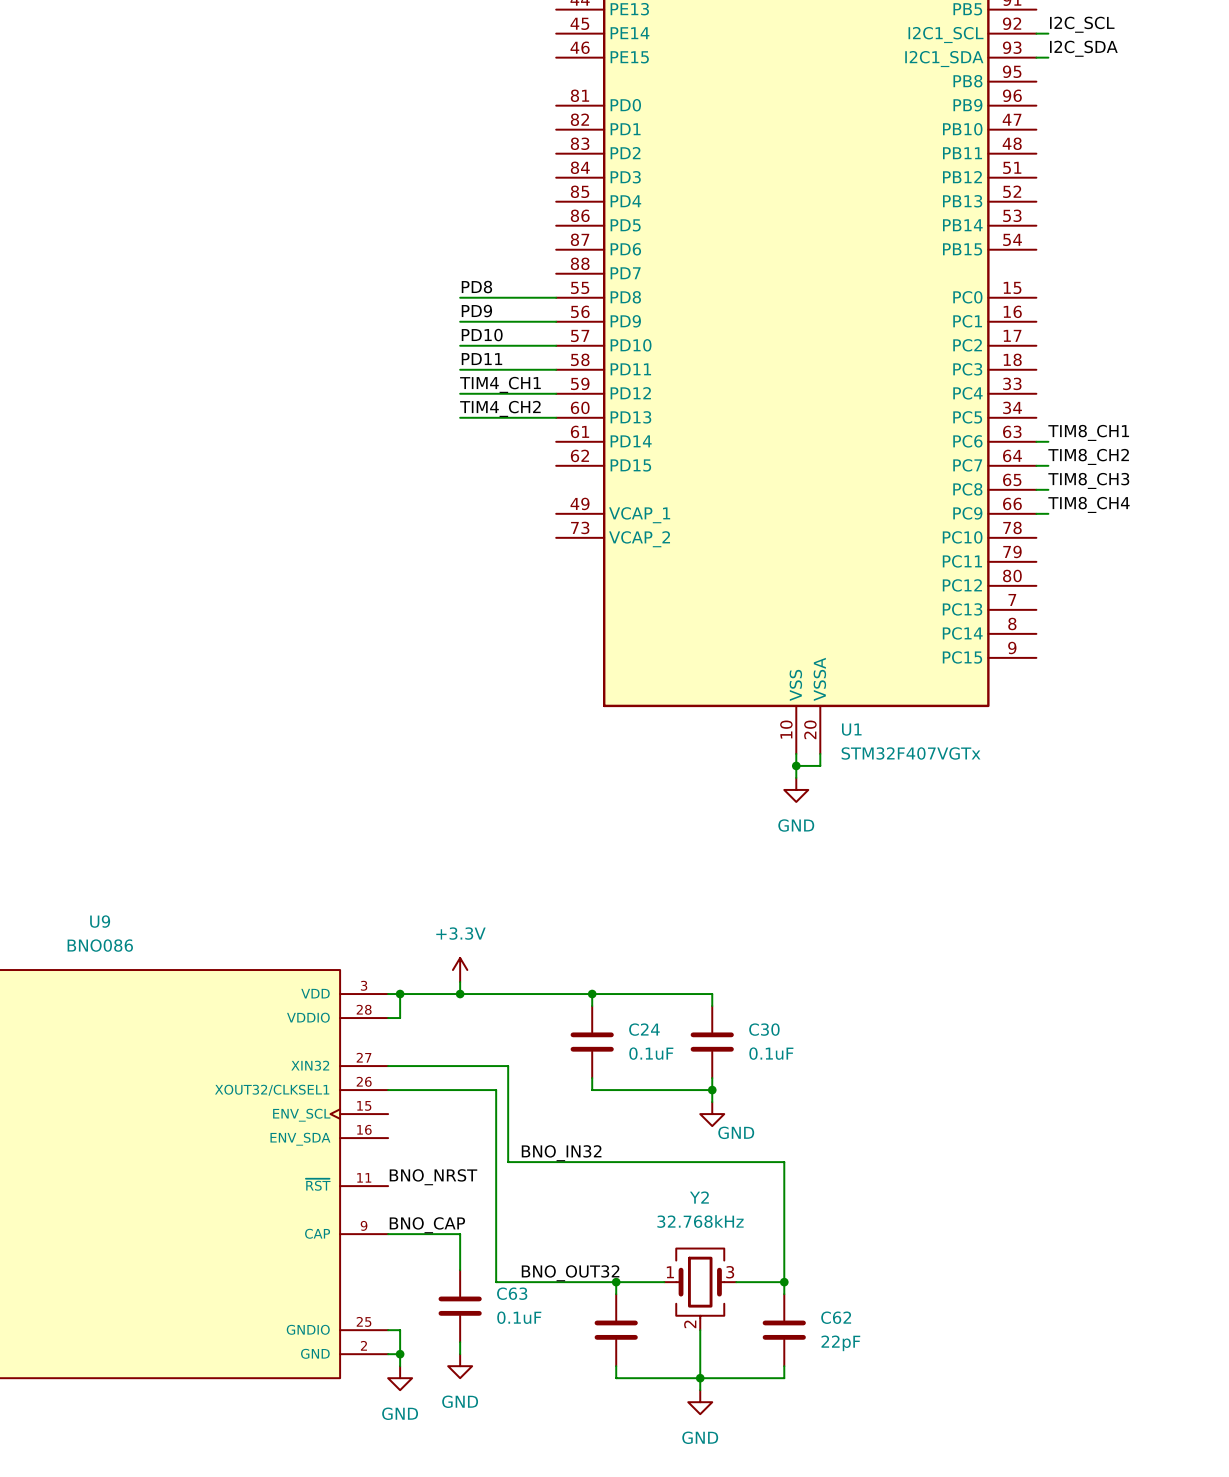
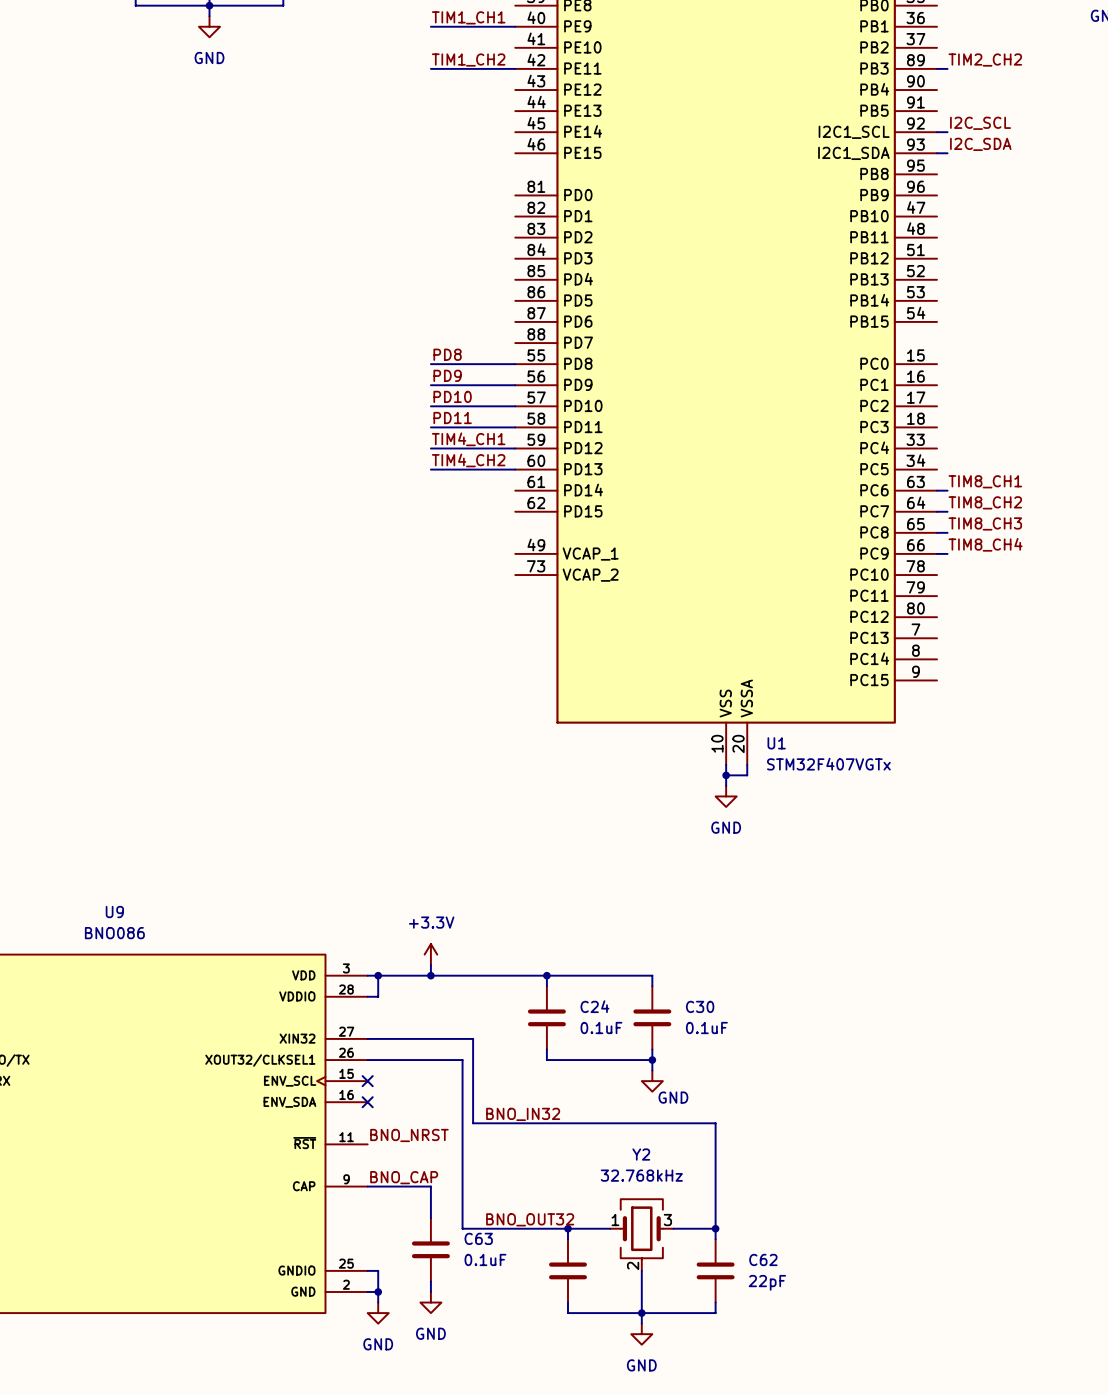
no-connect mark: none -> (367, 1081)
no-connect mark: none -> (367, 1102)

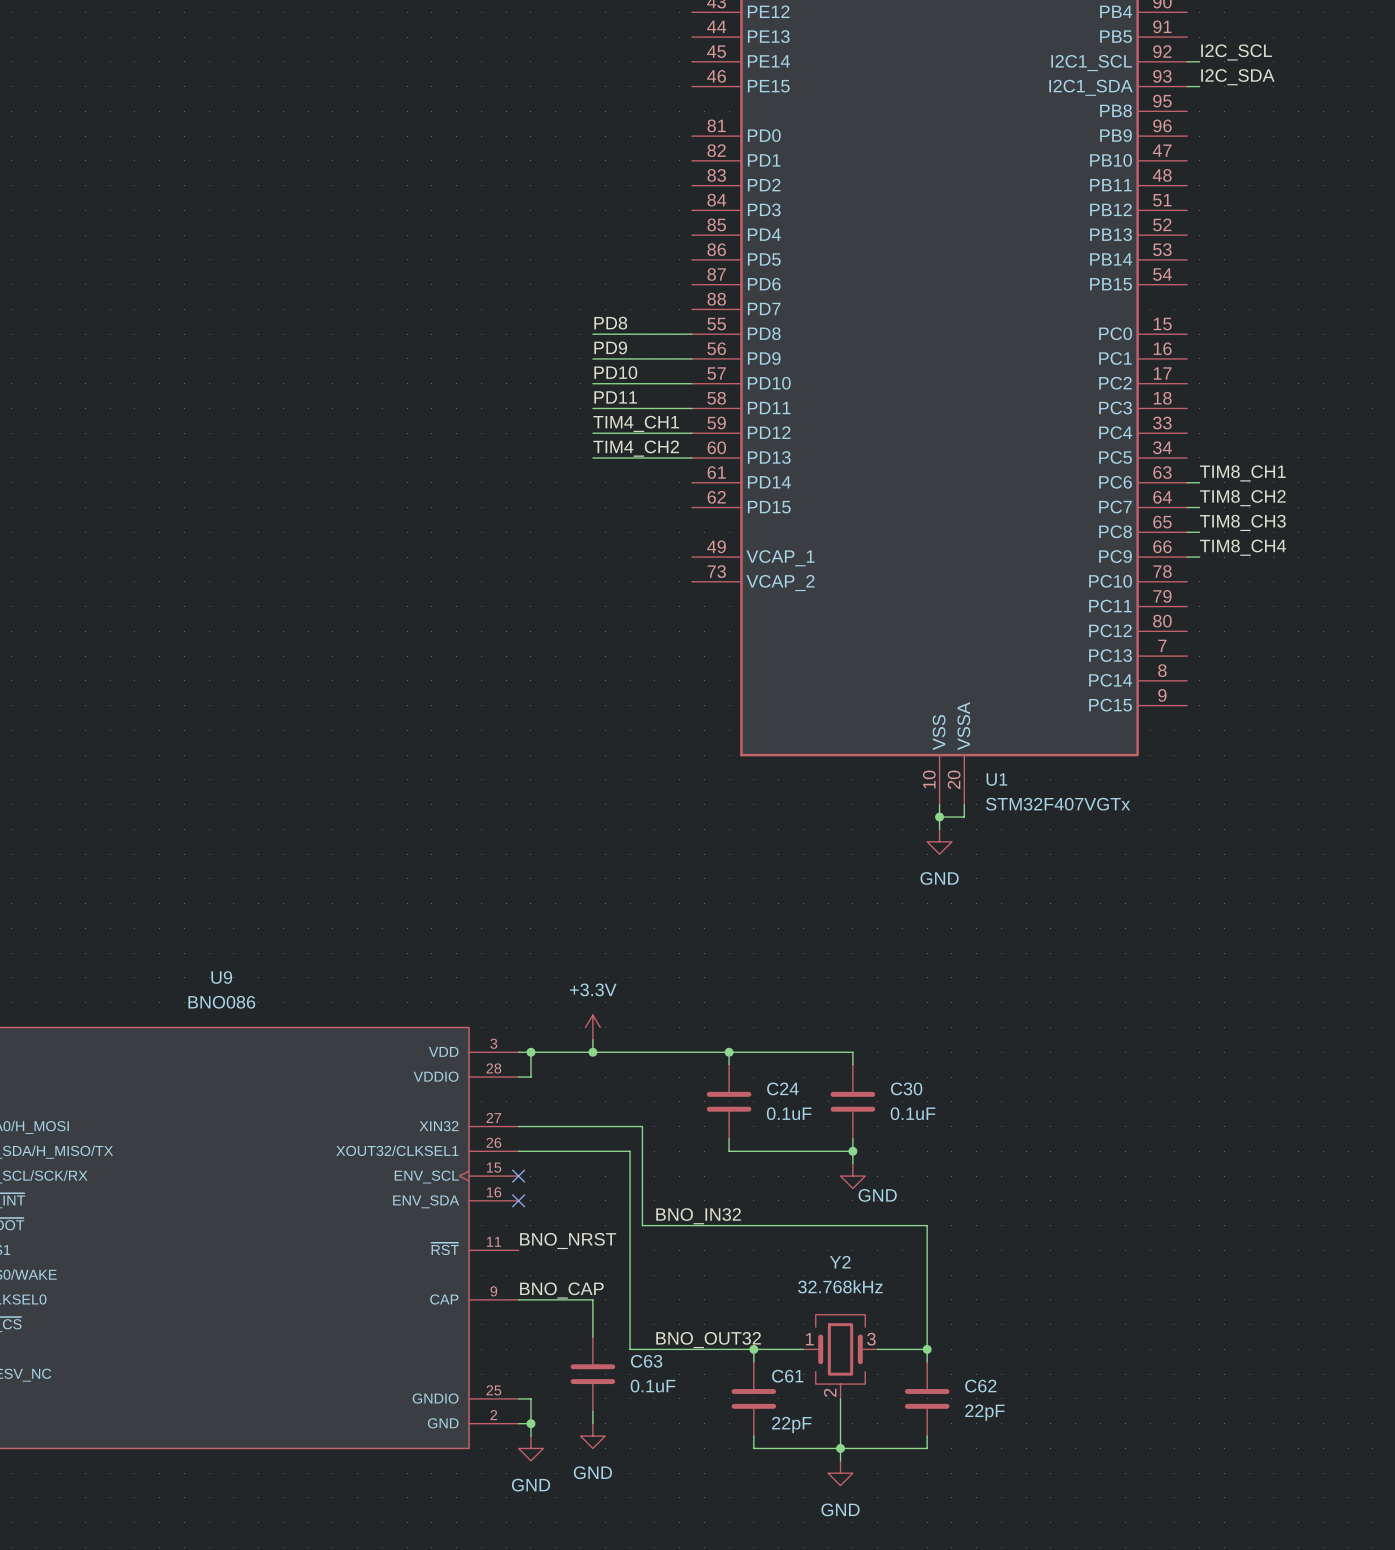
C61 name: none -> C61 (787, 1376)
C61 value: none -> 22pF (791, 1424)

